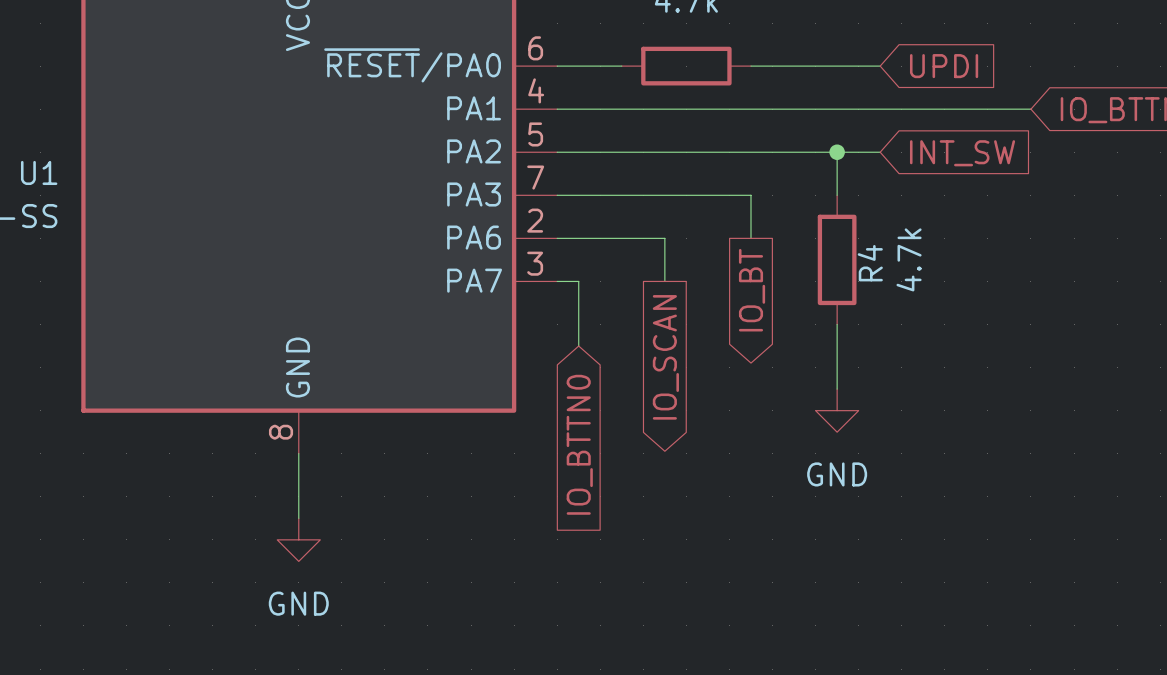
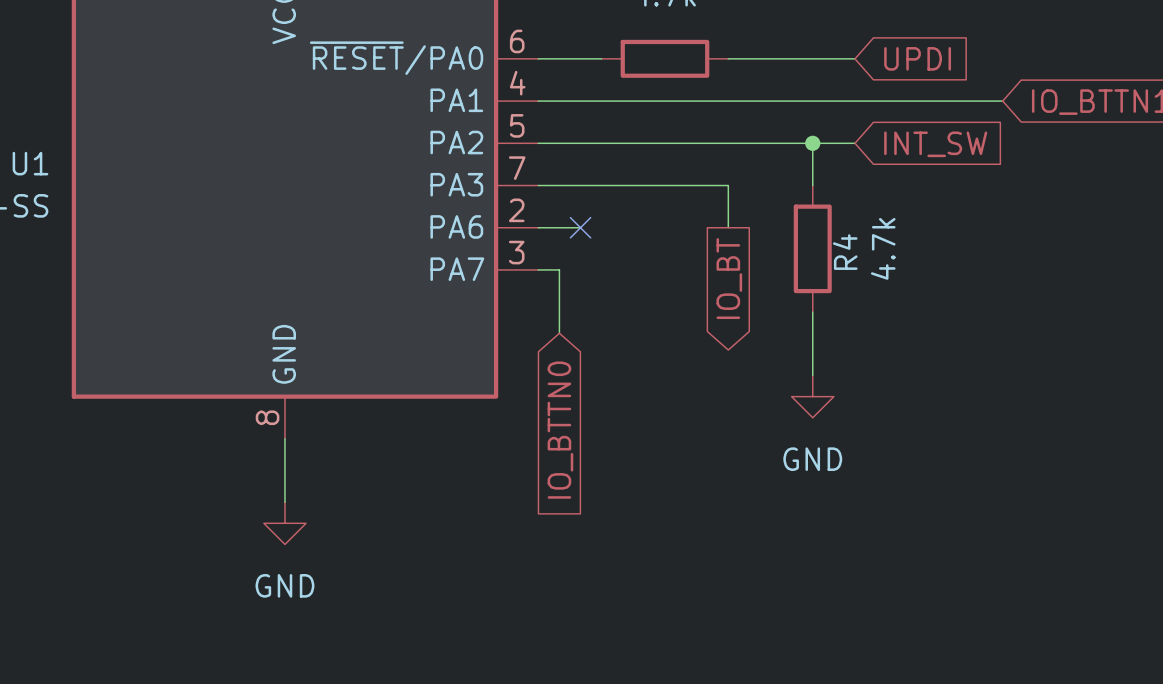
wire: (600, 238) (664, 238) (664, 281) -> none
no-connect mark: none -> (580, 227)
global label: IO_SCAN (665, 357) -> none

